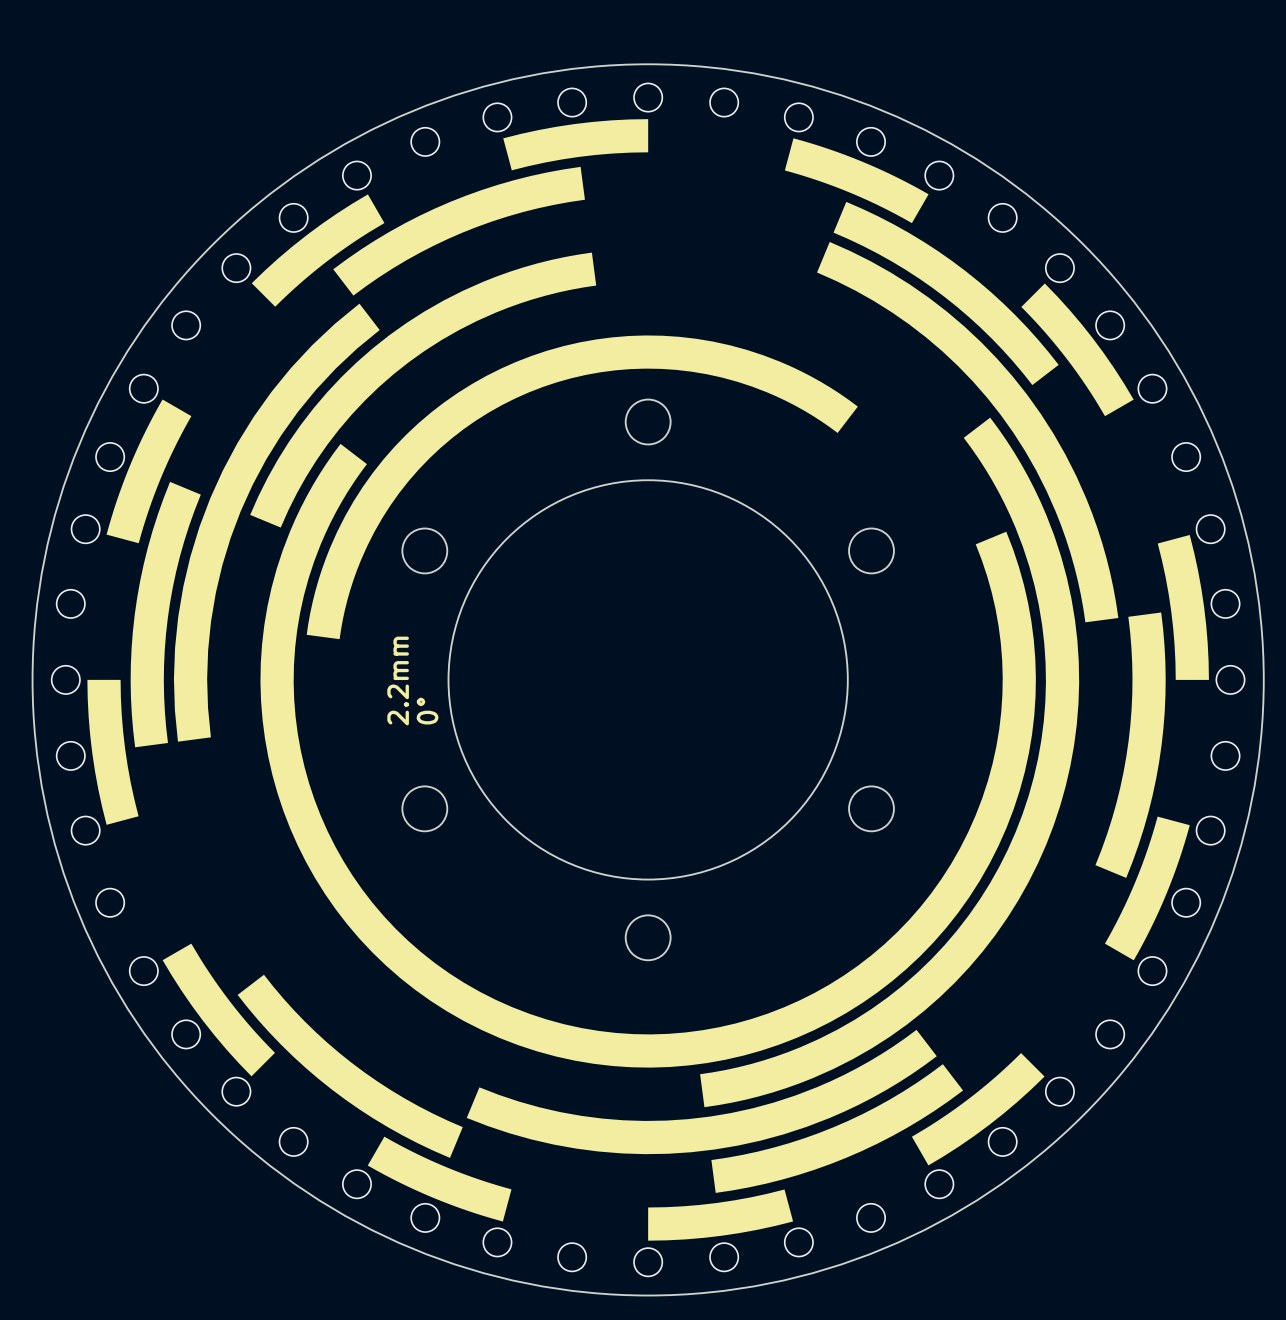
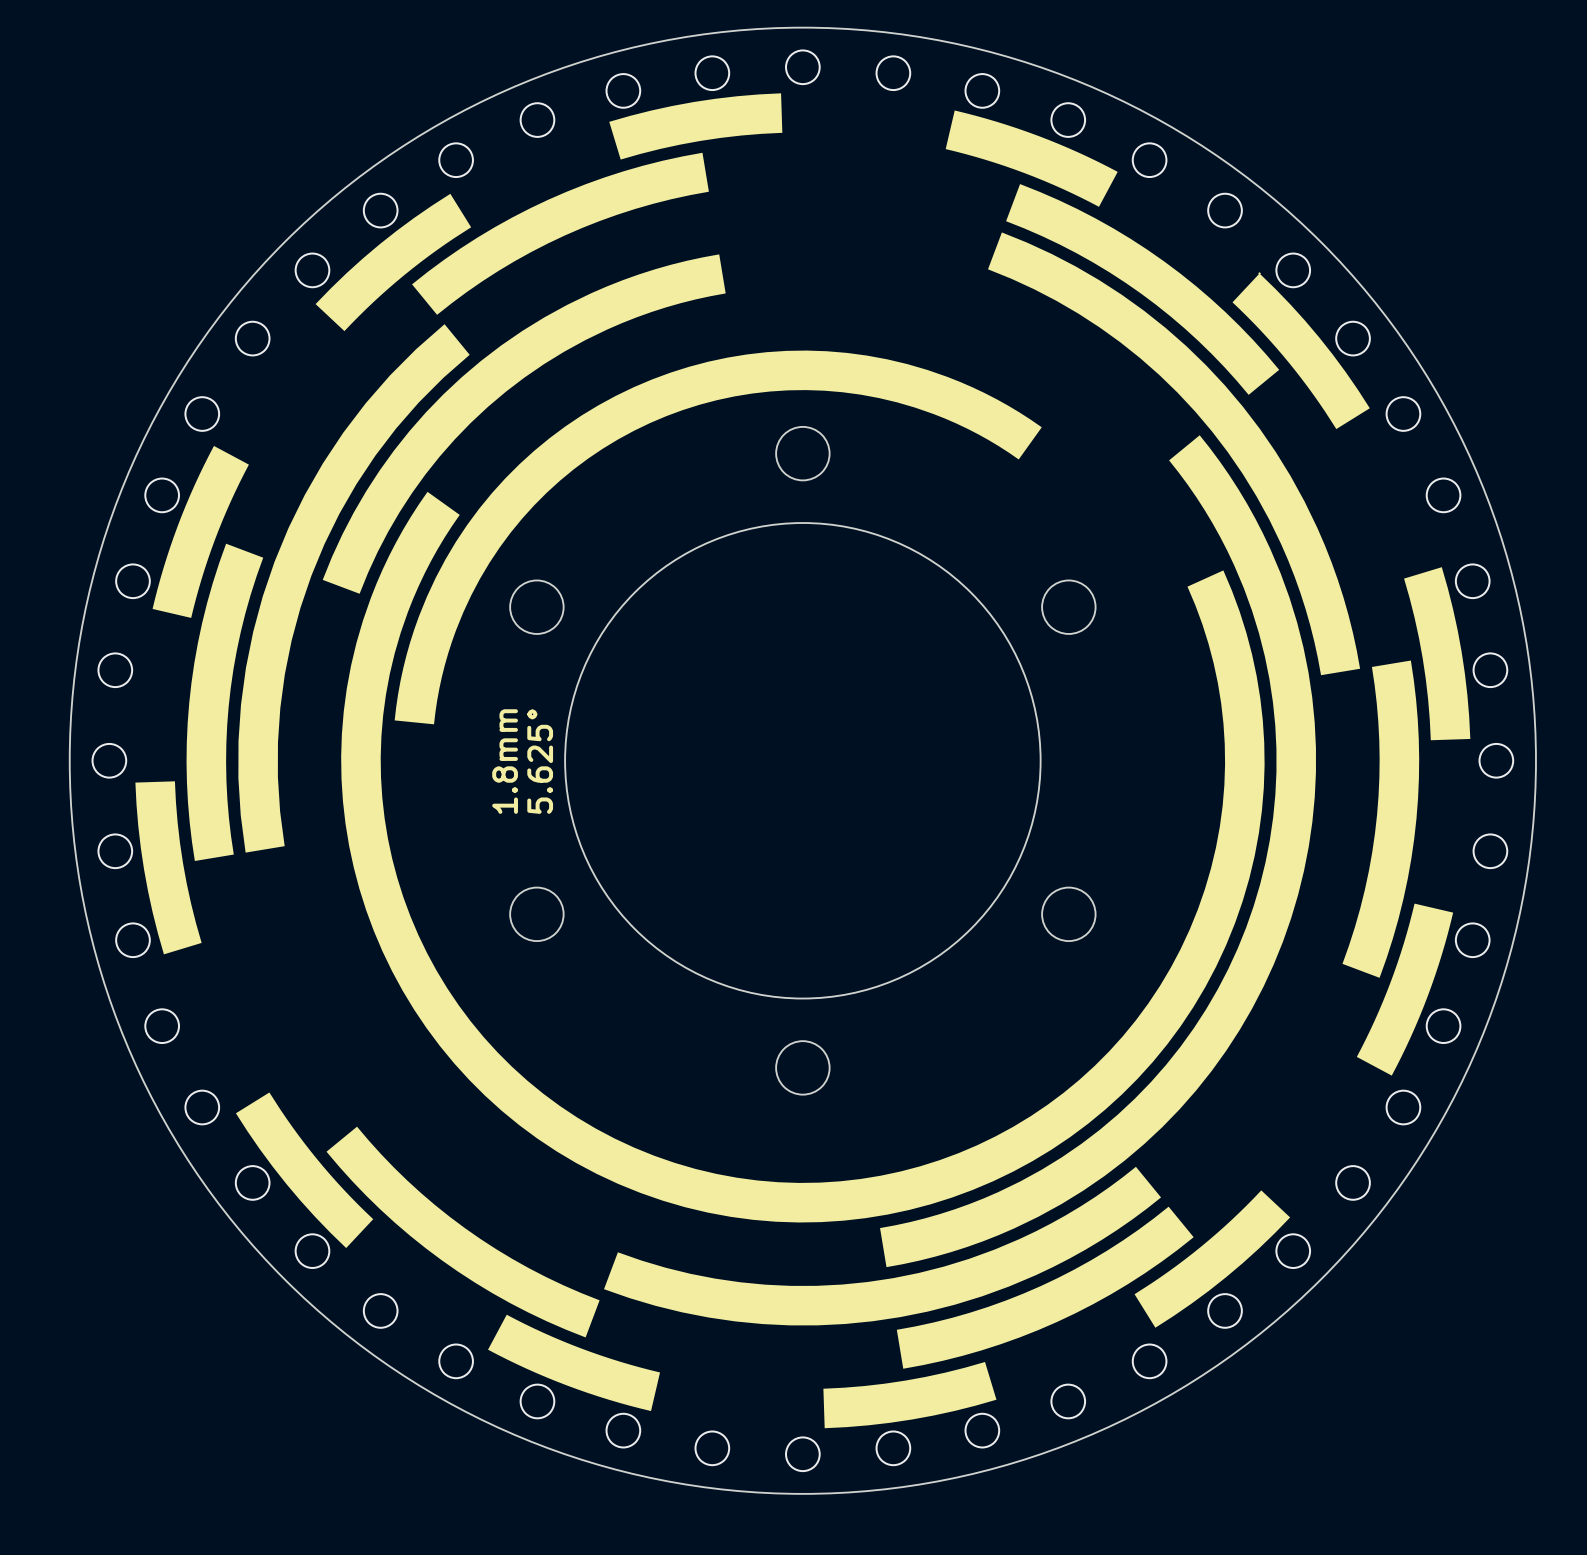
drawing shape: [87, 119, 1209, 1241] -> [135, 93, 1471, 1429]
text: 2.2mm (398, 680) -> 1.8mm (505, 761)
text: 0° (427, 711) -> 5.625° (540, 761)

